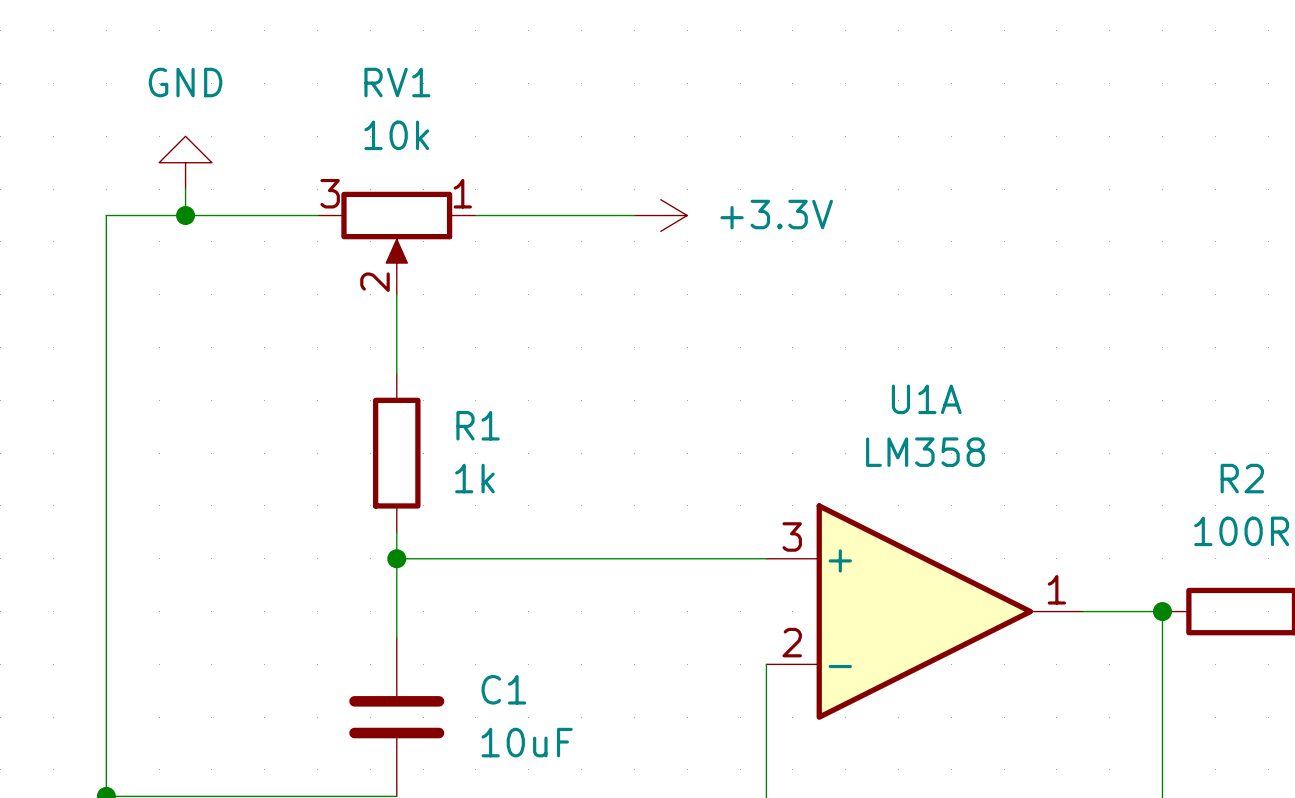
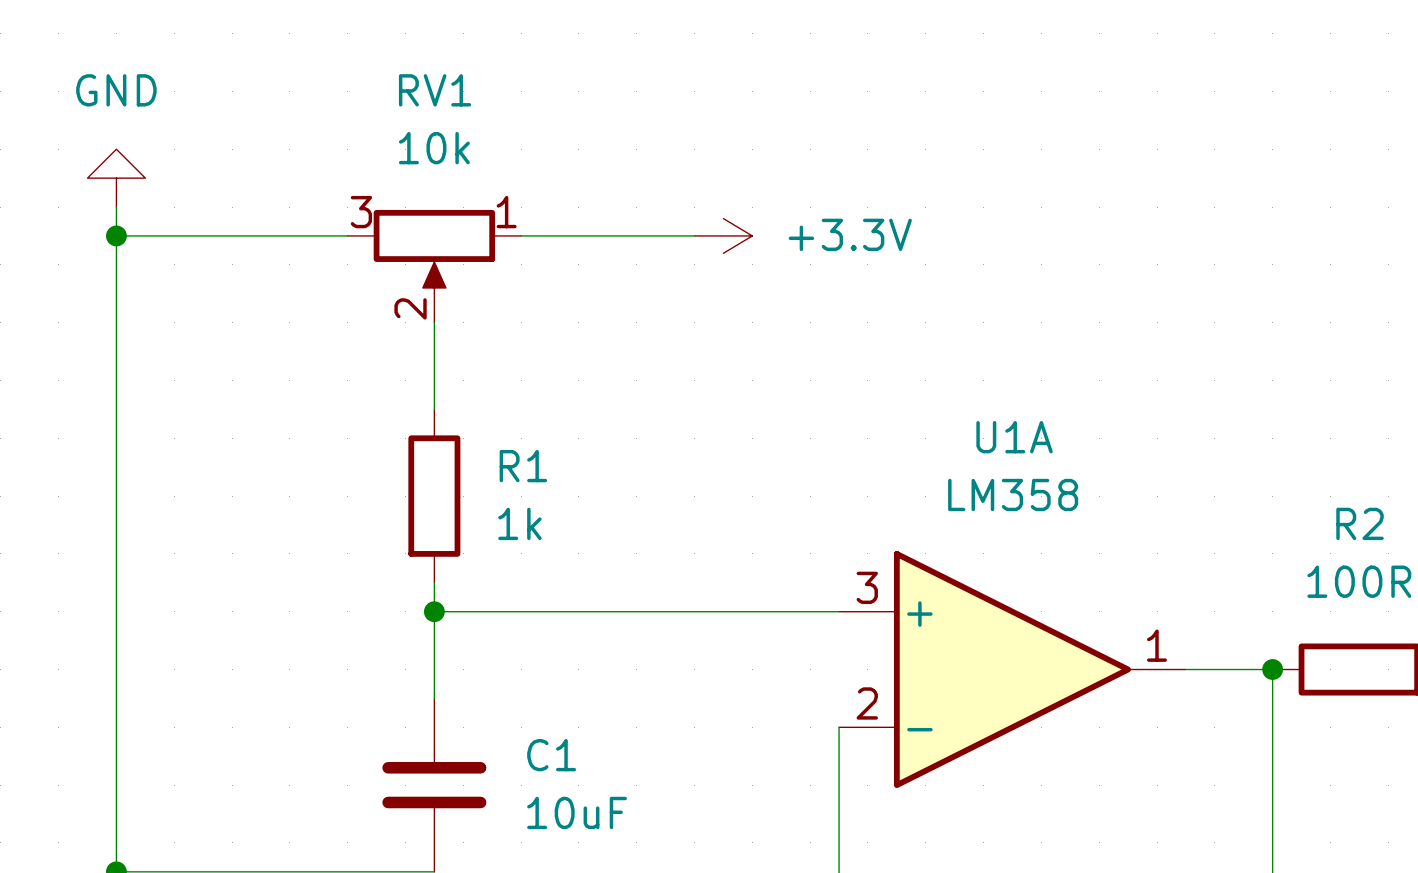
power symbol position: GND (185, 162) -> GND (116, 178)
wire: (185, 189) (185, 215) -> (116, 207) (116, 235)
junction position: (185, 215) -> (116, 235)

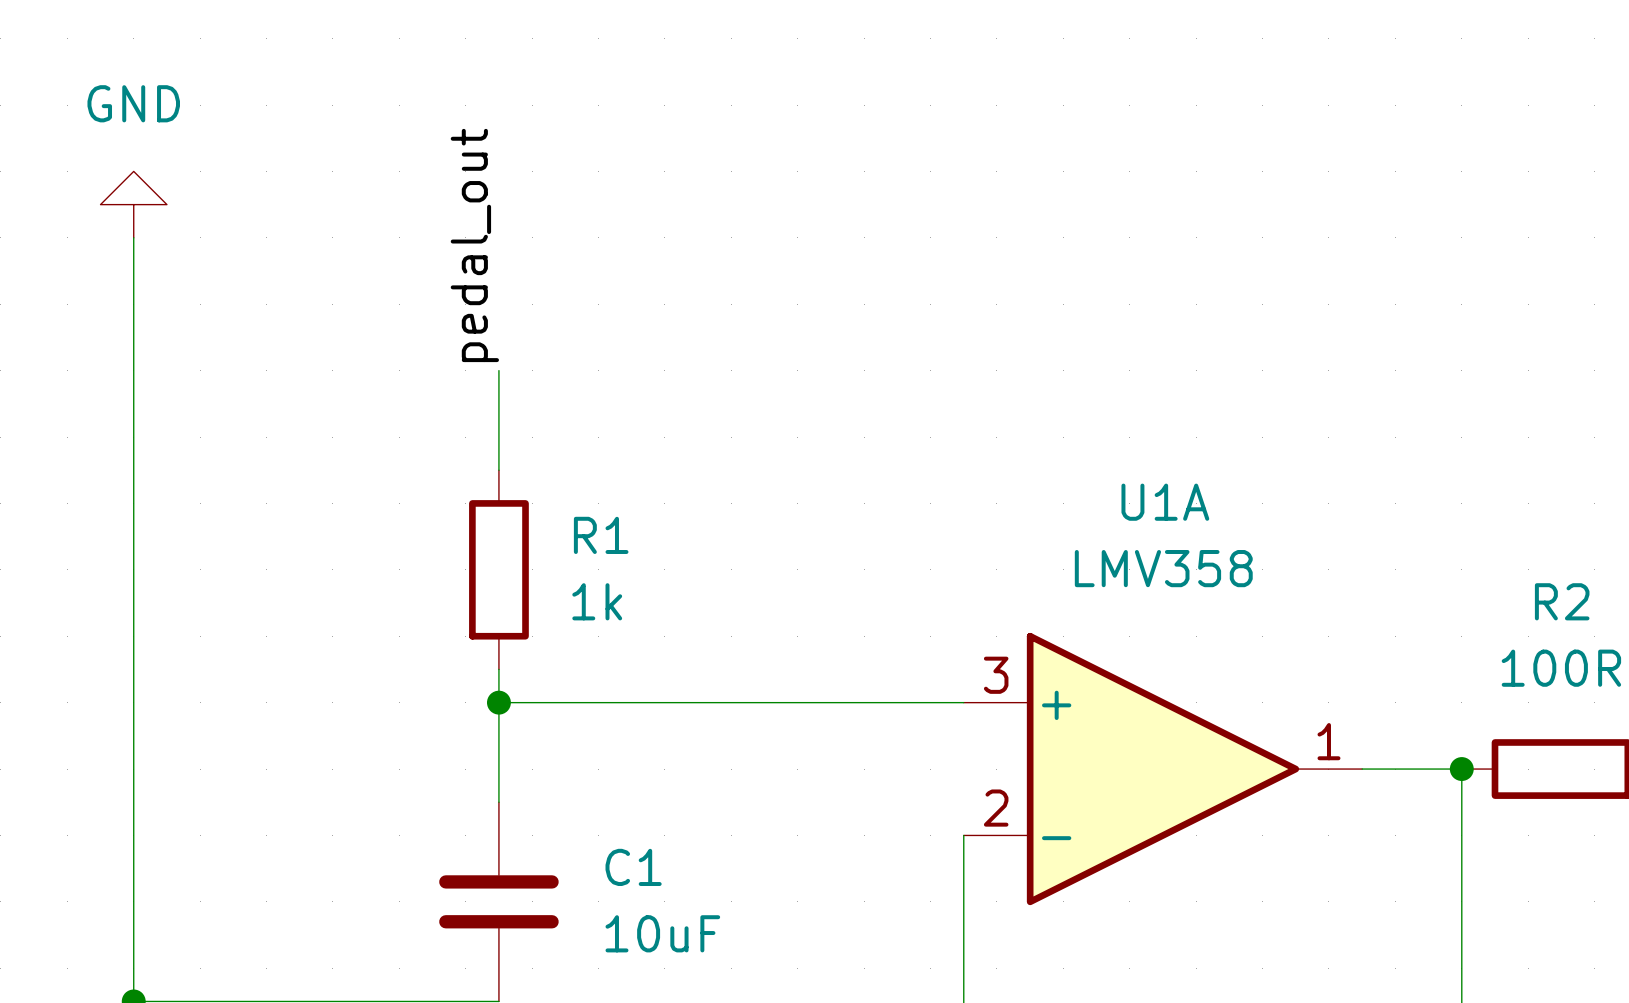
label: none -> pedal_out (474, 245)
wire: (116, 235) (347, 235) -> none
junction: (116, 235) -> none
wire: (521, 235) (694, 235) -> none
power symbol: +3.3V (723, 235) -> none
RV1: 10k (434, 266) -> none
U1A value: LM358 (1013, 495) -> LMV358 (1163, 568)

